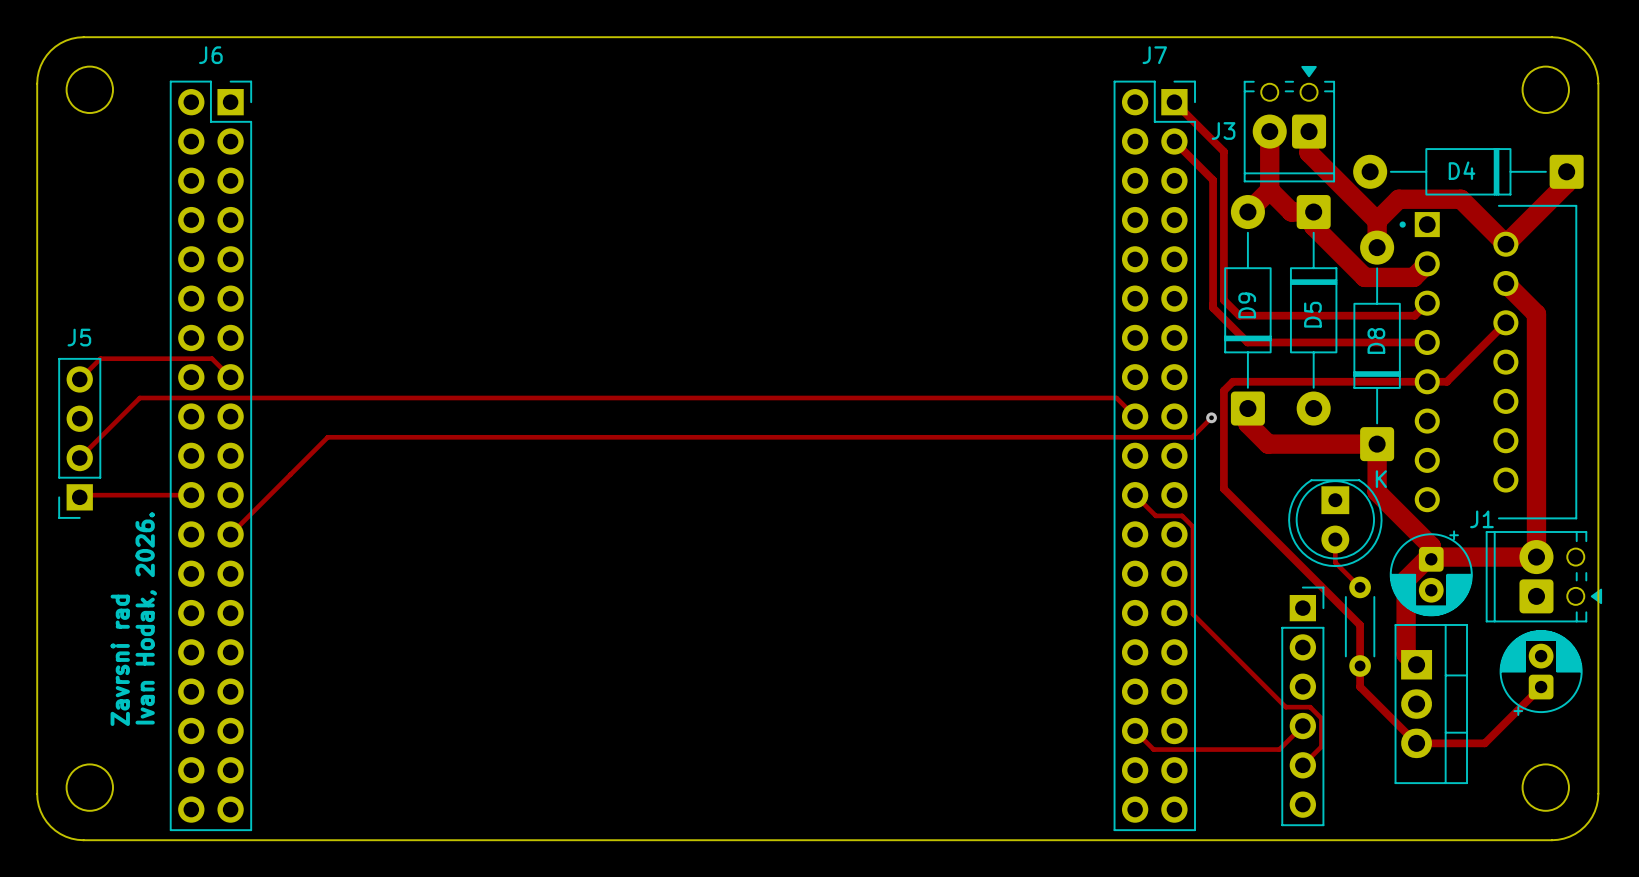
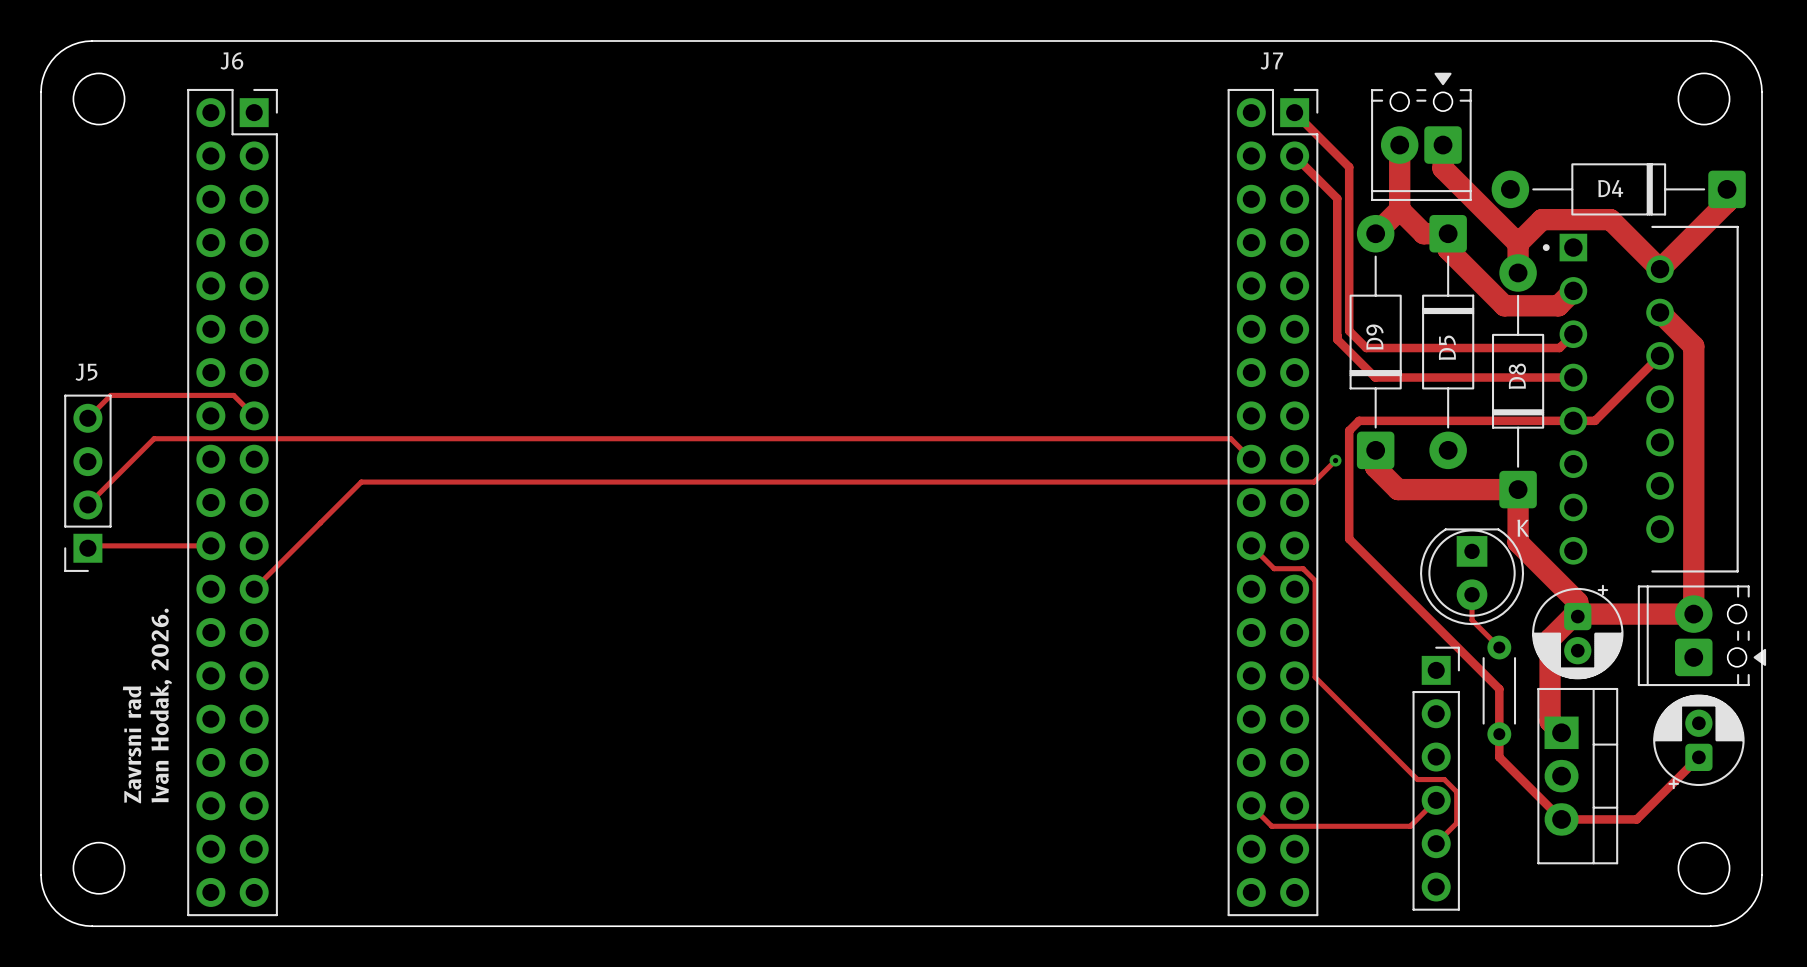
J3 name: J3 (1223, 130) -> none
J1 name: J1 (1481, 519) -> none

